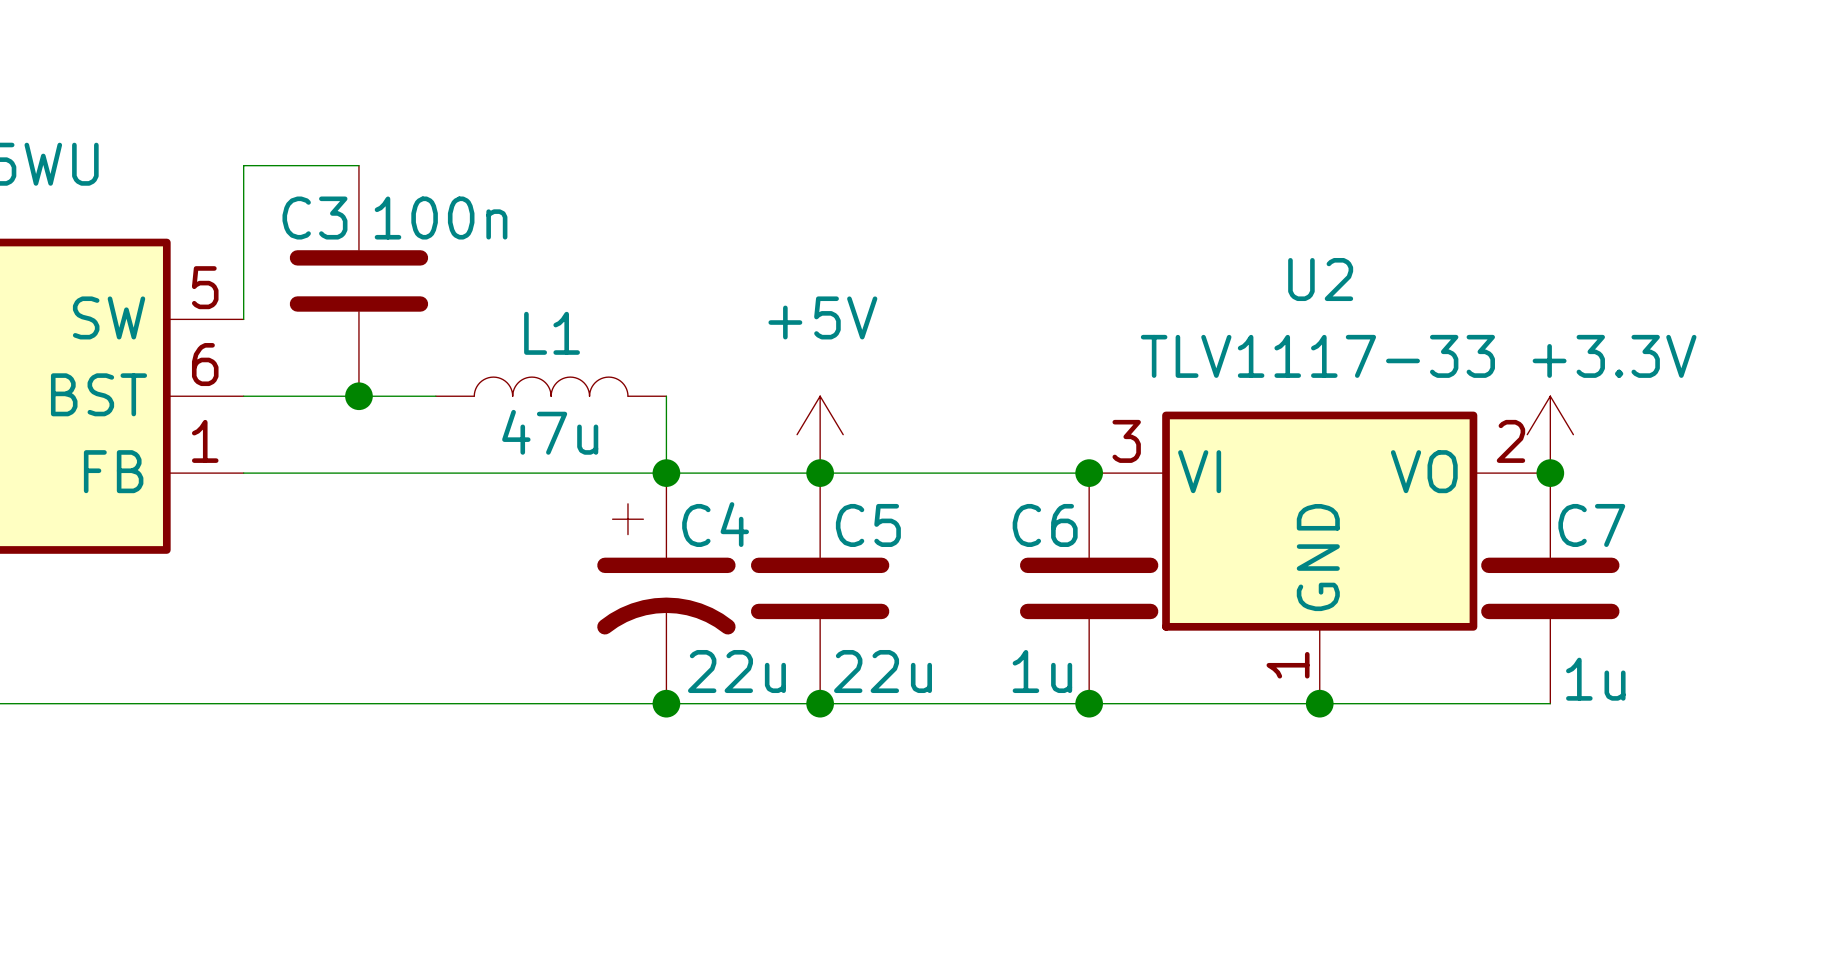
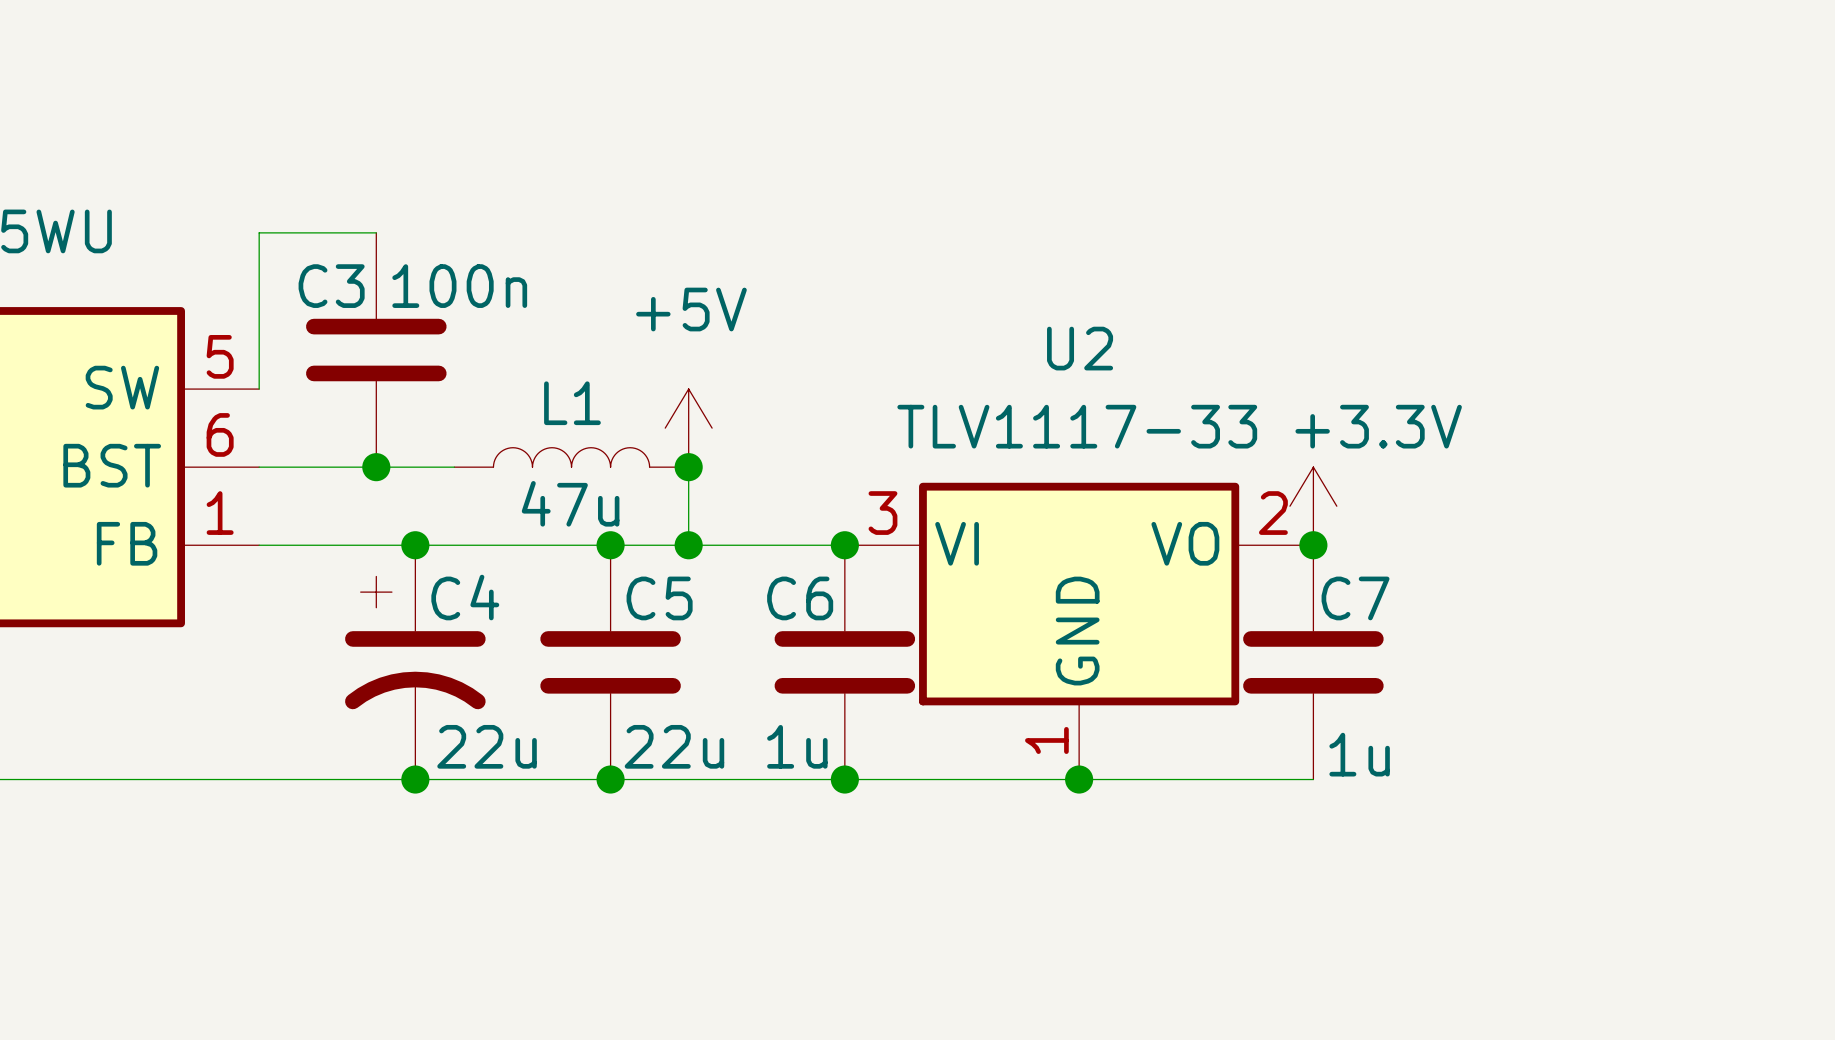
junction: none -> (688, 467)
power symbol position: +5V (820, 434) -> +5V (688, 428)
power symbol position: +3.3V (1550, 434) -> +3.3V (1313, 506)
junction: none -> (415, 545)
junction: none -> (610, 545)
junction: (1089, 473) -> none
junction: none -> (1313, 545)
junction: (1550, 473) -> none
C5 name: C5 (868, 525) -> C6 (800, 598)
U2 position: (1319, 557) -> (1079, 631)
C5: none -> 22u (610, 662)
C4 position: (666, 588) -> (415, 662)
C6: 1u (1089, 588) -> none
C7 position: (1550, 588) -> (1313, 662)
C5 value: 22u (883, 671) -> 1u (797, 746)
junction: none -> (415, 779)
junction position: (666, 703) -> (610, 779)
junction position: (1089, 703) -> (1079, 779)
wire: (1281, 703) (1550, 703) -> none
junction: (1319, 703) -> none

